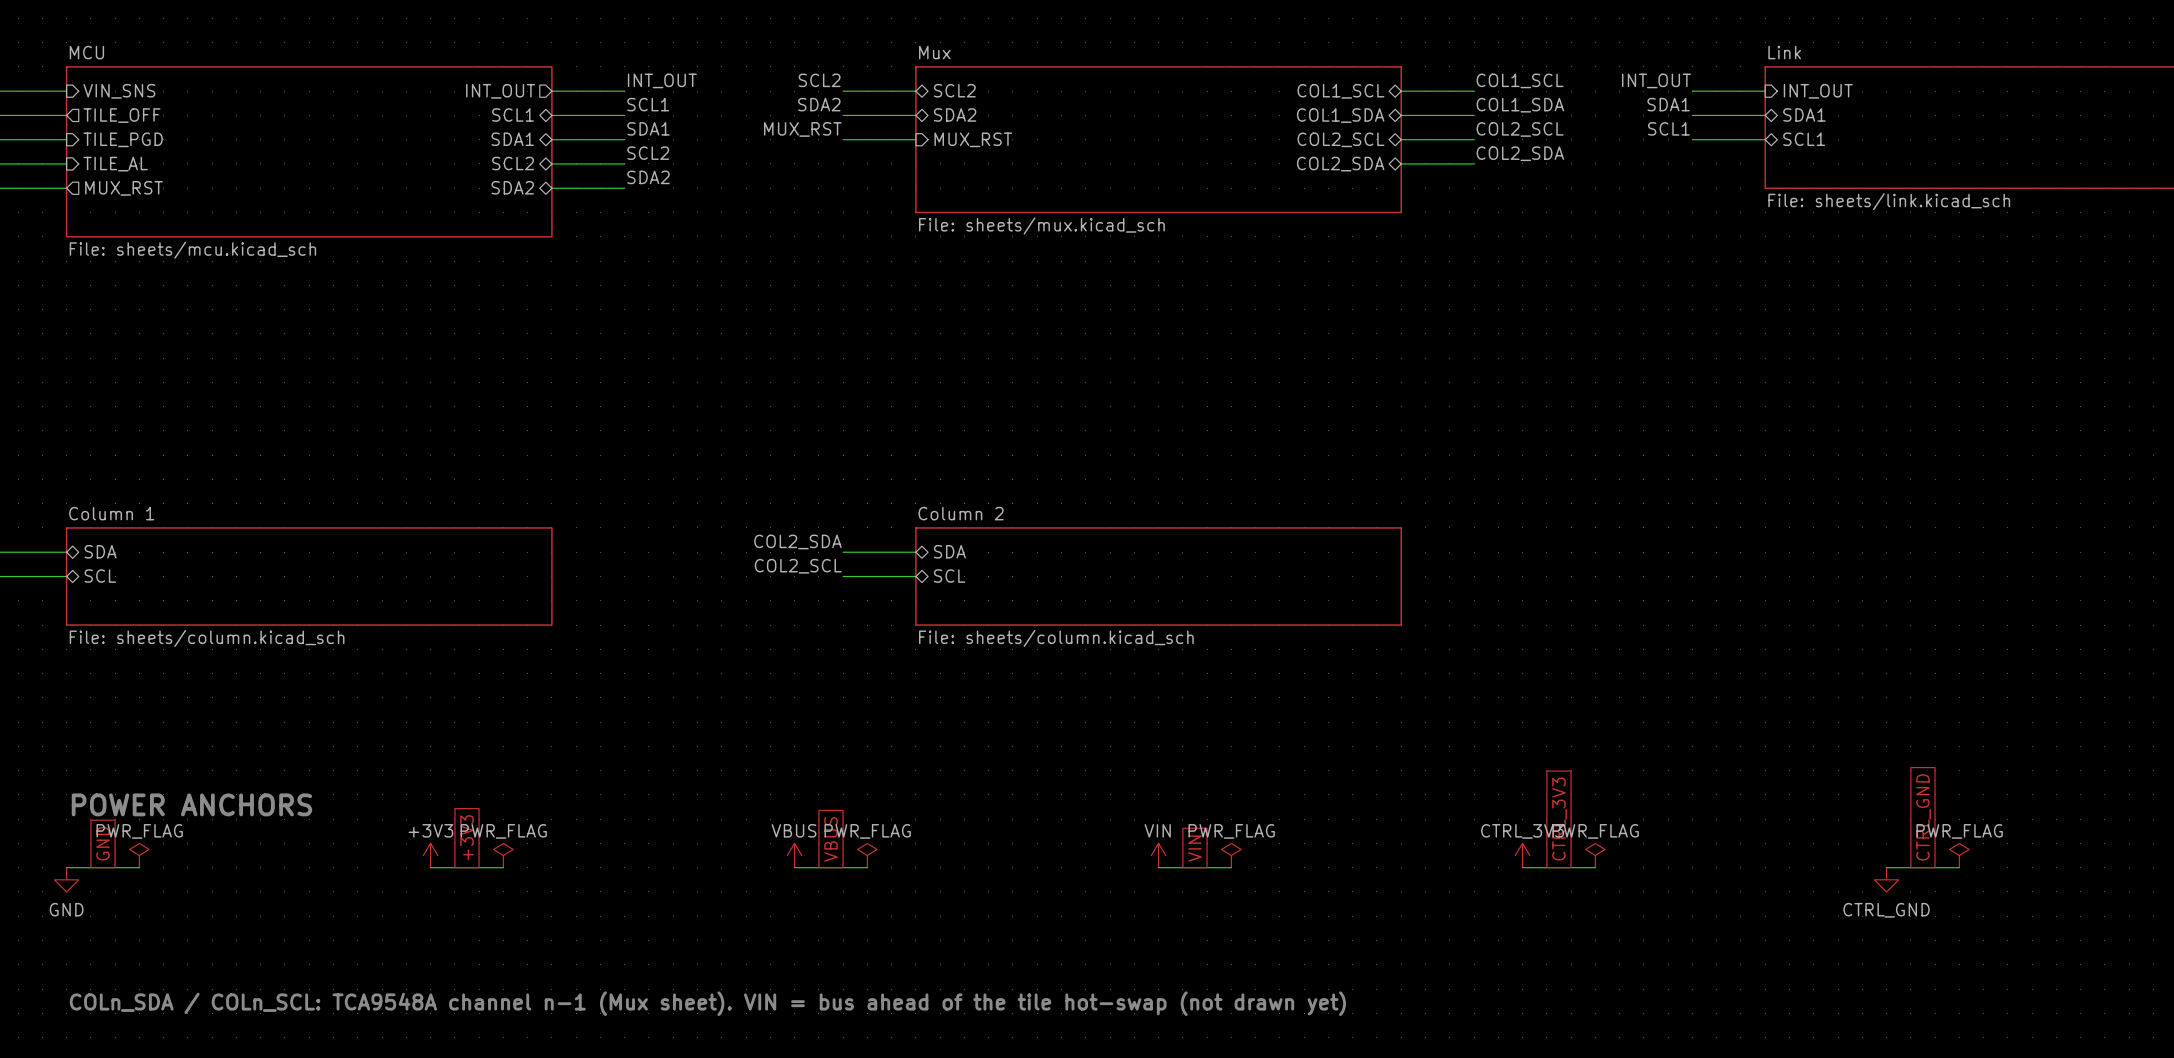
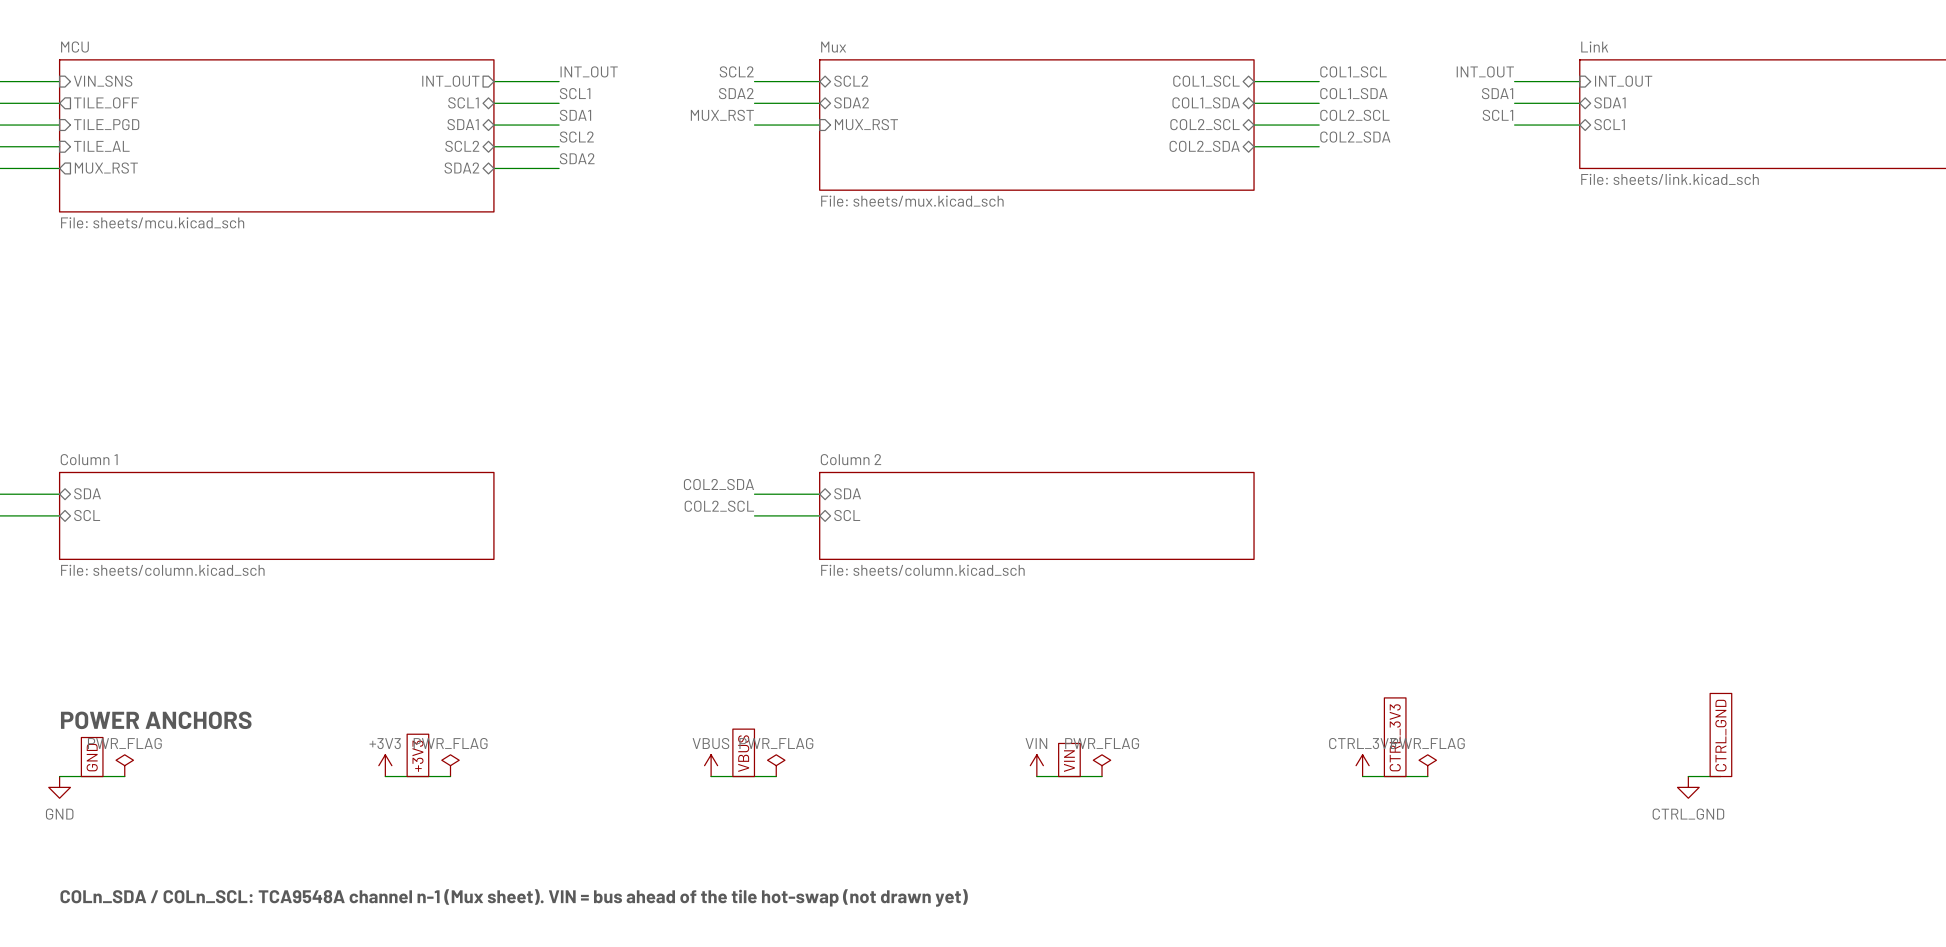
power symbol: PWR_FLAG (1959, 855) -> none
wire: (1922, 867) (1959, 867) -> none

